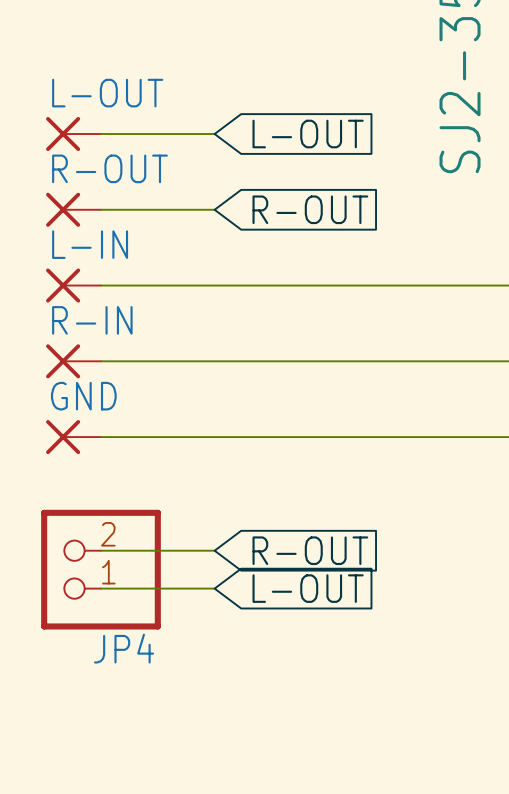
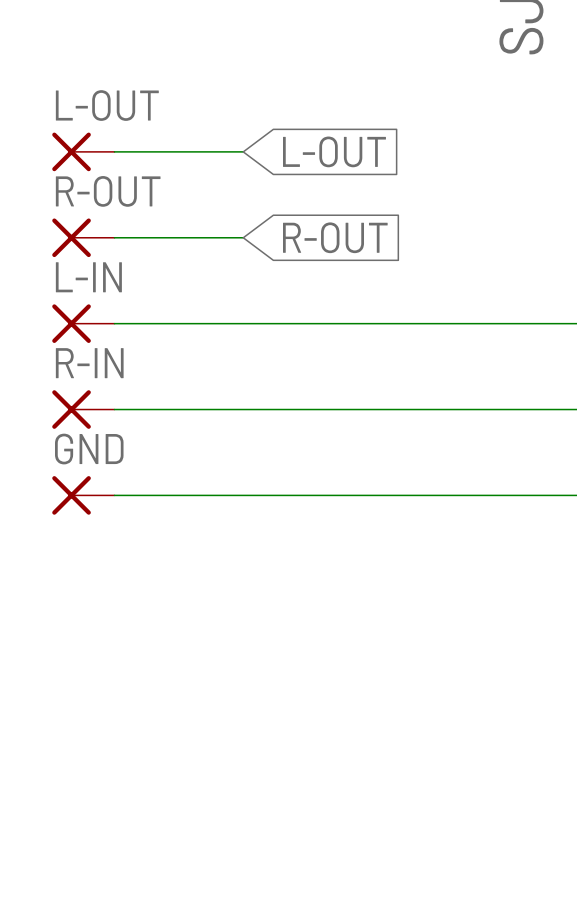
wire: (101, 550) (214, 550) -> none
global label: R-OUT (310, 550) -> none
JP4: (101, 569) -> none
wire: (101, 588) (214, 588) -> none
global label: L-OUT (308, 588) -> none

